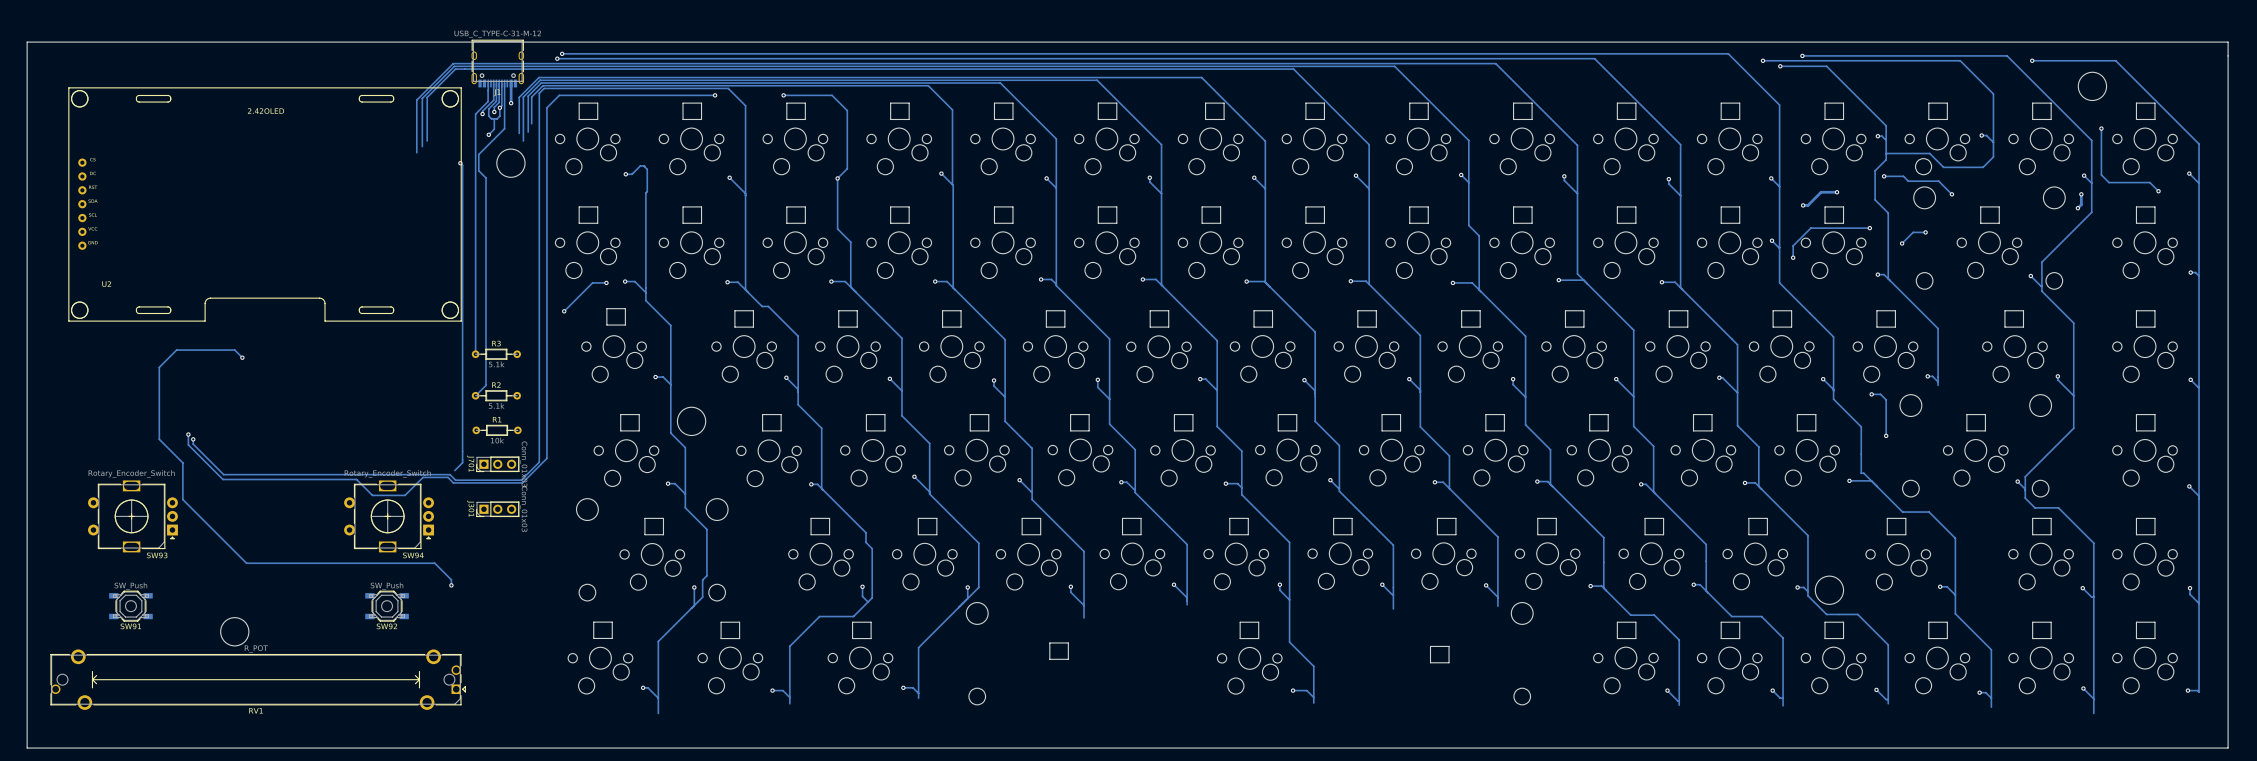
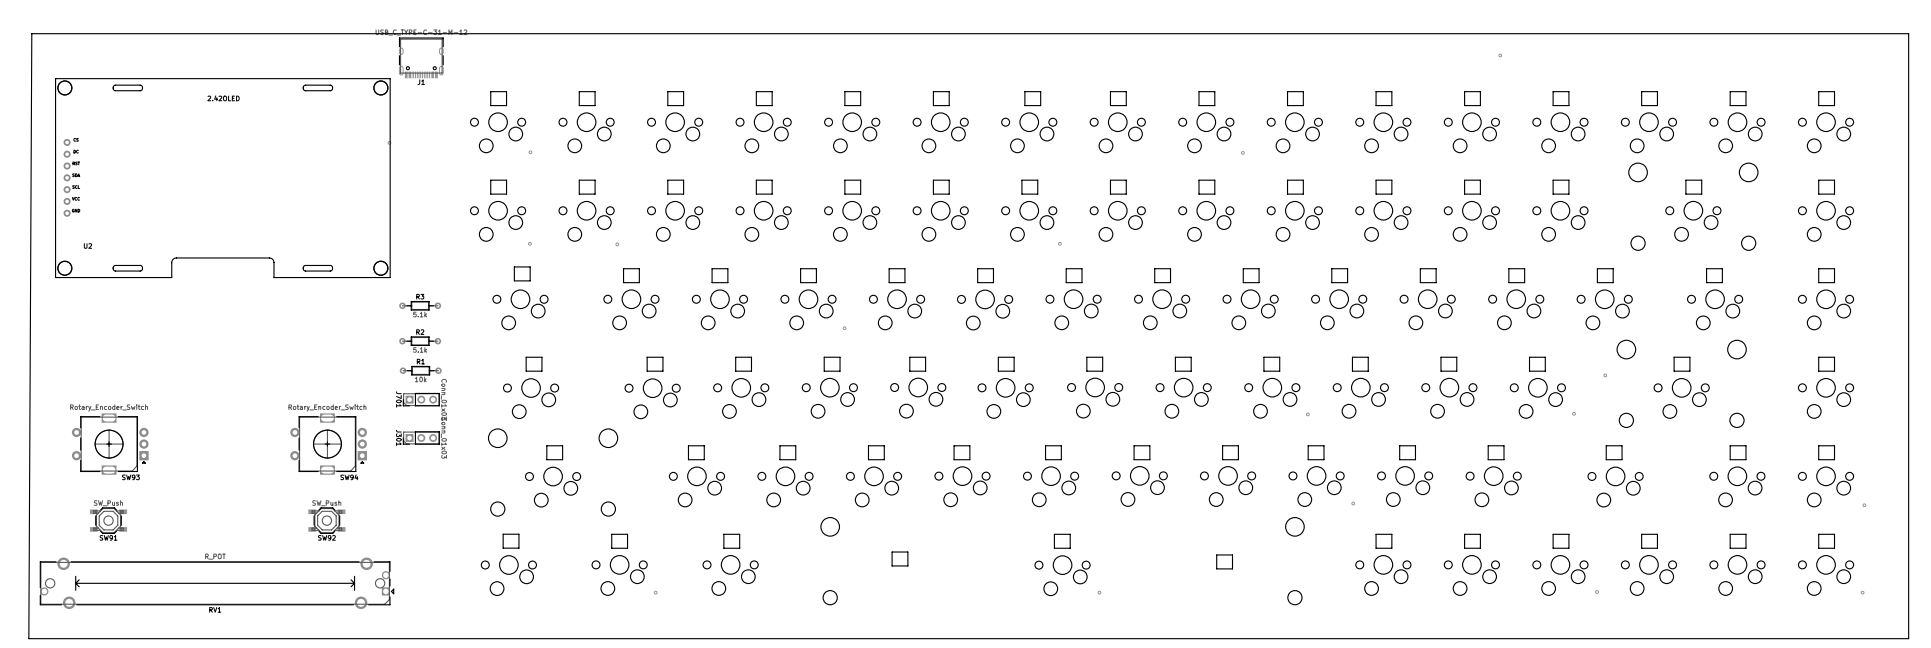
board edge: (2228, 42) (2228, 748) (27, 748) (27, 42) (2228, 42) -> (1908, 33) (1908, 638) (28, 638) (31, 33) (1908, 33)
track: (562, 53) (1728, 53) (1779, 105) (1779, 282) (1833, 336) (1833, 399) (1861, 426) (1861, 473) (1863, 473) (1902, 512) (1929, 512) (1955, 538) (1955, 613) (1991, 649) (1991, 707) -> none
via: (562, 53) -> none
track: (1802, 55) (2007, 55) (2091, 140) (2091, 212) (2041, 262) (2041, 291) (2073, 323) (2073, 428) (2025, 476) (2025, 498) (2034, 507) (2058, 507) (2093, 543) (2093, 713) -> none
via: (1802, 55) -> none
track: (557, 58) (1594, 58) (1680, 144) (1680, 287) -> none
via: (557, 58) -> none
track: (1762, 60) (1960, 60) (1993, 93) (1993, 156) (1983, 167) (1943, 167) (1929, 153) (1886, 154) -> none
track: (2032, 60) (2115, 60) (2199, 143) (2199, 691) (2187, 690) -> none
via: (2032, 60) -> none
track: (1780, 66) (1826, 66) (1886, 125) (1886, 159) (1875, 170) (1875, 199) (1888, 213) (1888, 278) -> none
via: (1780, 66) -> none
round board edge: [2078, 72, 2107, 101] -> none
track: (488, 83) (488, 101) (475, 114) (475, 354) -> none
track: (493, 83) (493, 100) (482, 111) (482, 114) -> none
track: (499, 83) (499, 102) (494, 107) (494, 111) -> none
track: (501, 83) (499, 116) (497, 118) (491, 118) (488, 116) (488, 109) (496, 101) (496, 83) -> none
track: (504, 83) (504, 128) (478, 154) (478, 170) (486, 178) (486, 385) (475, 395) -> none
track: (511, 83) (511, 103) -> none
track: (715, 95) (559, 95) (546, 107) (546, 458) (522, 482) (453, 482) (447, 477) (423, 477) (405, 495) (372, 495) (356, 479) (223, 479) (188, 444) (188, 434) -> none
via: (715, 95) -> none
track: (783, 95) (832, 95) (847, 110) (847, 168) (837, 178) (837, 228) (850, 242) (850, 287) -> none
via: (783, 95) -> none
via: (511, 103) -> none
via: (499, 107) -> none
via: (494, 111) -> none
via: (482, 114) -> none
track: (494, 118) (494, 129) (488, 134) -> none
track: (531, 123) (531, 97) (543, 85) (928, 85) (952, 109) (952, 184) -> none
track: (2101, 128) (2101, 174) (2109, 182) (2149, 182) (2158, 191) -> none
via: (2101, 128) -> none
track: (528, 132) (528, 96) (541, 83) (1000, 83) (1056, 138) (1056, 285) (1109, 339) (1109, 424) (1135, 449) (1135, 492) (1187, 544) (1187, 604) -> none
track: (519, 133) (519, 97) (539, 77) (1201, 77) (1265, 141) (1265, 282) -> none
via: (488, 134) -> none
track: (1981, 135) (1986, 135) (1993, 142) -> none
via: (1981, 135) -> none
track: (1877, 136) (1882, 136) (1886, 140) -> none
via: (1877, 136) -> none
track: (427, 141) (427, 97) (455, 69) (1293, 69) (1369, 144) (1369, 284) -> none
track: (523, 141) (523, 97) (540, 80) (1097, 80) (1161, 144) (1161, 285) -> none
track: (422, 146) (422, 98) (454, 66) (1394, 66) (1468, 140) (1468, 225) (1479, 235) (1479, 289) -> none
round board edge: [496, 148, 526, 178] -> none
track: (416, 152) (416, 100) (453, 63) (1495, 63) (1577, 145) (1577, 273) (1633, 330) (1633, 426) (1653, 446) (1653, 491) -> none
track: (460, 163) (462, 165) (462, 462) (454, 470) -> none
track: (941, 173) (953, 185) (953, 287) -> none
via: (941, 173) -> none
track: (2189, 173) (2199, 183) -> none
via: (2189, 173) -> none
track: (625, 174) (632, 174) (640, 165) (644, 165) (647, 169) (645, 300) (670, 325) (670, 433) (685, 447) (685, 507) (706, 529) (706, 575) (702, 580) (702, 597) (658, 641) (658, 713) -> none
track: (1461, 174) (1468, 182) -> none
track: (1356, 175) (1369, 188) -> none
via: (1356, 175) -> none
track: (2084, 175) (2091, 183) -> none
via: (2084, 175) -> none
track: (1564, 176) (1564, 180) (1577, 193) -> none
via: (1564, 176) -> none
track: (1884, 176) (1903, 176) (1908, 181) (1938, 181) (1951, 194) -> none
via: (1884, 176) -> none
track: (729, 177) (745, 193) -> none
via: (729, 177) -> none
track: (1149, 177) (1149, 181) (1161, 193) -> none
via: (1149, 177) -> none
track: (1254, 177) (1265, 188) -> none
via: (1254, 177) -> none
via: (837, 178) -> none
track: (1046, 178) (1056, 188) -> none
via: (1046, 178) -> none
track: (1771, 178) (1779, 186) -> none
via: (1771, 178) -> none
track: (1668, 179) (1668, 183) (1680, 195) -> none
via: (1668, 179) -> none
via: (2158, 191) -> none
track: (1837, 192) (1821, 192) (1807, 205) (1803, 205) -> none
via: (1837, 192) -> none
via: (1951, 194) -> none
track: (2081, 194) (2081, 204) (2077, 208) -> none
via: (2081, 194) -> none
via: (1803, 205) -> none
via: (2077, 208) -> none
track: (1869, 228) (1810, 228) (1793, 245) (1793, 257) -> none
via: (1869, 228) -> none
track: (1925, 232) (1913, 232) (1902, 243) -> none
via: (1925, 232) -> none
track: (1771, 240) (1779, 247) -> none
via: (1771, 240) -> none
via: (1902, 243) -> none
via: (1793, 257) -> none
track: (2190, 272) (2195, 272) (2199, 276) -> none
via: (2190, 272) -> none
track: (1877, 274) (1884, 274) (1938, 328) (1938, 385) -> none
via: (1877, 274) -> none
track: (2030, 276) (2041, 286) -> none
via: (2030, 276) -> none
track: (1041, 279) (1051, 279) (1056, 284) -> none
via: (1041, 279) -> none
track: (1142, 279) (1155, 279) (1217, 340) (1217, 426) (1241, 451) (1241, 494) (1289, 542) (1289, 642) (1313, 666) (1313, 703) -> none
via: (1142, 279) -> none
via: (1558, 280) -> none
track: (1583, 280) (1558, 280) -> none
track: (625, 281) (634, 281) (645, 292) -> none
track: (831, 281) (845, 281) (901, 338) (901, 415) (929, 443) (929, 494) (978, 543) (978, 587) (918, 647) (918, 698) -> none
via: (831, 281) -> none
track: (935, 281) (946, 281) (1005, 339) (1005, 421) (1032, 448) (1032, 499) (1084, 551) (1084, 617) -> none
via: (935, 281) -> none
track: (1246, 281) (1264, 281) (1315, 332) (1315, 421) (1339, 445) (1339, 491) (1393, 545) (1393, 608) -> none
track: (1350, 281) (1366, 281) (1420, 335) (1420, 426) (1449, 455) (1449, 488) -> none
via: (1350, 281) -> none
track: (606, 282) (592, 282) (564, 311) -> none
via: (606, 282) -> none
track: (727, 282) (737, 282) (762, 306) (768, 306) (798, 336) (798, 404) (821, 428) (821, 488) -> none
track: (1452, 282) (1472, 282) (1525, 336) (1525, 424) (1550, 449) (1550, 484) -> none
via: (1452, 282) -> none
track: (1661, 282) (1675, 282) (1737, 344) (1737, 425) (1758, 446) (1758, 486) -> none
via: (1661, 282) -> none
track: (745, 289) (745, 105) (728, 88) (544, 88) (539, 93) (539, 462) (521, 480) (455, 480) (450, 474) (223, 474) (193, 444) (193, 439) -> none
via: (564, 311) -> none
track: (242, 357) (234, 350) (176, 350) (159, 367) (159, 439) (182, 462) (182, 499) (246, 563) (434, 563) (451, 579) (451, 585) -> none
via: (242, 357) -> none
track: (1927, 376) (1932, 376) (1938, 381) -> none
via: (1927, 376) -> none
track: (2057, 376) (2057, 379) (2073, 395) -> none
via: (2057, 376) -> none
track: (655, 377) (663, 377) (670, 384) -> none
via: (655, 377) -> none
track: (786, 377) (798, 389) -> none
via: (786, 377) -> none
track: (1719, 377) (1722, 377) (1737, 392) -> none
via: (1719, 377) -> none
track: (889, 378) (901, 390) -> none
via: (889, 378) -> none
track: (1097, 379) (1097, 387) (1109, 399) -> none
via: (1097, 379) -> none
track: (1200, 379) (1205, 379) (1217, 390) -> none
via: (1200, 379) -> none
track: (1409, 379) (1420, 390) -> none
via: (1409, 379) -> none
track: (1513, 379) (1513, 384) (1525, 397) -> none
via: (1513, 379) -> none
track: (1616, 379) (1633, 396) -> none
via: (1616, 379) -> none
track: (1823, 379) (1833, 389) -> none
via: (1823, 379) -> none
track: (2190, 379) (2199, 387) -> none
via: (2190, 379) -> none
track: (994, 380) (994, 386) (1005, 397) -> none
track: (1304, 380) (1315, 390) -> none
via: (1304, 380) -> none
track: (1871, 394) (1880, 394) (1886, 399) (1886, 435) -> none
via: (1871, 394) -> none
round board edge: [677, 407, 706, 436] -> none
via: (188, 434) -> none
via: (193, 439) -> none
track: (914, 476) (929, 491) -> none
via: (914, 476) -> none
track: (1019, 480) (1032, 491) -> none
via: (1019, 480) -> none
track: (1330, 480) (1339, 488) -> none
via: (1330, 480) -> none
track: (1871, 480) (1849, 480) -> none
track: (1537, 481) (1547, 481) (1603, 537) (1603, 588) -> none
track: (2017, 481) (2025, 489) -> none
via: (2017, 481) -> none
track: (1121, 482) (1126, 482) (1135, 490) -> none
via: (1121, 482) -> none
track: (1434, 482) (1443, 482) (1497, 536) (1497, 606) -> none
via: (1434, 482) -> none
track: (1744, 482) (1755, 482) (1807, 535) (1807, 595) (1826, 614) (1857, 614) (1888, 644) (1888, 703) -> none
via: (1744, 482) -> none
track: (668, 483) (674, 483) (685, 494) -> none
via: (668, 483) -> none
track: (1225, 483) (1237, 483) (1241, 487) -> none
via: (1225, 483) -> none
track: (811, 484) (817, 484) (865, 532) (865, 542) (872, 548) (872, 597) (853, 616) (819, 616) (789, 646) (789, 703) -> none
via: (811, 484) -> none
track: (1641, 484) (1646, 484) (1706, 544) (1706, 590) -> none
via: (1641, 484) -> none
track: (2189, 486) (2199, 496) -> none
via: (2189, 486) -> none
round board edge: [1815, 575, 1844, 605] -> none
track: (1173, 584) (1187, 597) -> none
via: (1173, 584) -> none
track: (1279, 584) (1279, 590) (1289, 599) -> none
via: (1279, 584) -> none
track: (1382, 584) (1393, 595) -> none
via: (1382, 584) -> none
track: (1693, 584) (1700, 584) (1731, 616) (1761, 616) (1783, 638) (1783, 705) -> none
via: (1693, 584) -> none
via: (451, 585) -> none
track: (1486, 585) (1497, 597) -> none
via: (1486, 585) -> none
track: (862, 586) (862, 596) (868, 602) -> none
via: (862, 586) -> none
track: (1070, 586) (1070, 592) (1084, 605) -> none
via: (1070, 586) -> none
track: (1590, 586) (1601, 586) (1630, 615) (1654, 615) (1679, 640) (1679, 705) -> none
track: (1940, 586) (1947, 586) (1955, 595) -> none
via: (1940, 586) -> none
track: (694, 587) (694, 605) -> none
via: (694, 587) -> none
track: (967, 587) (967, 598) -> none
via: (967, 587) -> none
track: (1797, 587) (1803, 587) (1807, 591) -> none
via: (1797, 587) -> none
track: (2082, 588) (2093, 597) -> none
via: (2082, 588) -> none
track: (2190, 588) (2190, 594) (2199, 603) -> none
round board edge: [220, 617, 250, 647] -> none
track: (643, 687) (647, 687) (658, 698) -> none
via: (643, 687) -> none
track: (903, 687) (913, 687) (918, 693) -> none
via: (903, 687) -> none
track: (2083, 688) (2093, 698) -> none
via: (2083, 688) -> none
track: (1876, 689) (1888, 699) -> none
track: (772, 690) (782, 690) (789, 697) -> none
track: (1293, 690) (1306, 690) (1313, 697) -> none
track: (1667, 690) (1679, 700) -> none
via: (1667, 690) -> none
track: (1772, 690) (1780, 698) (1783, 698) -> none
via: (1772, 690) -> none
track: (1979, 692) (1985, 692) (1991, 698) -> none
via: (1979, 692) -> none

